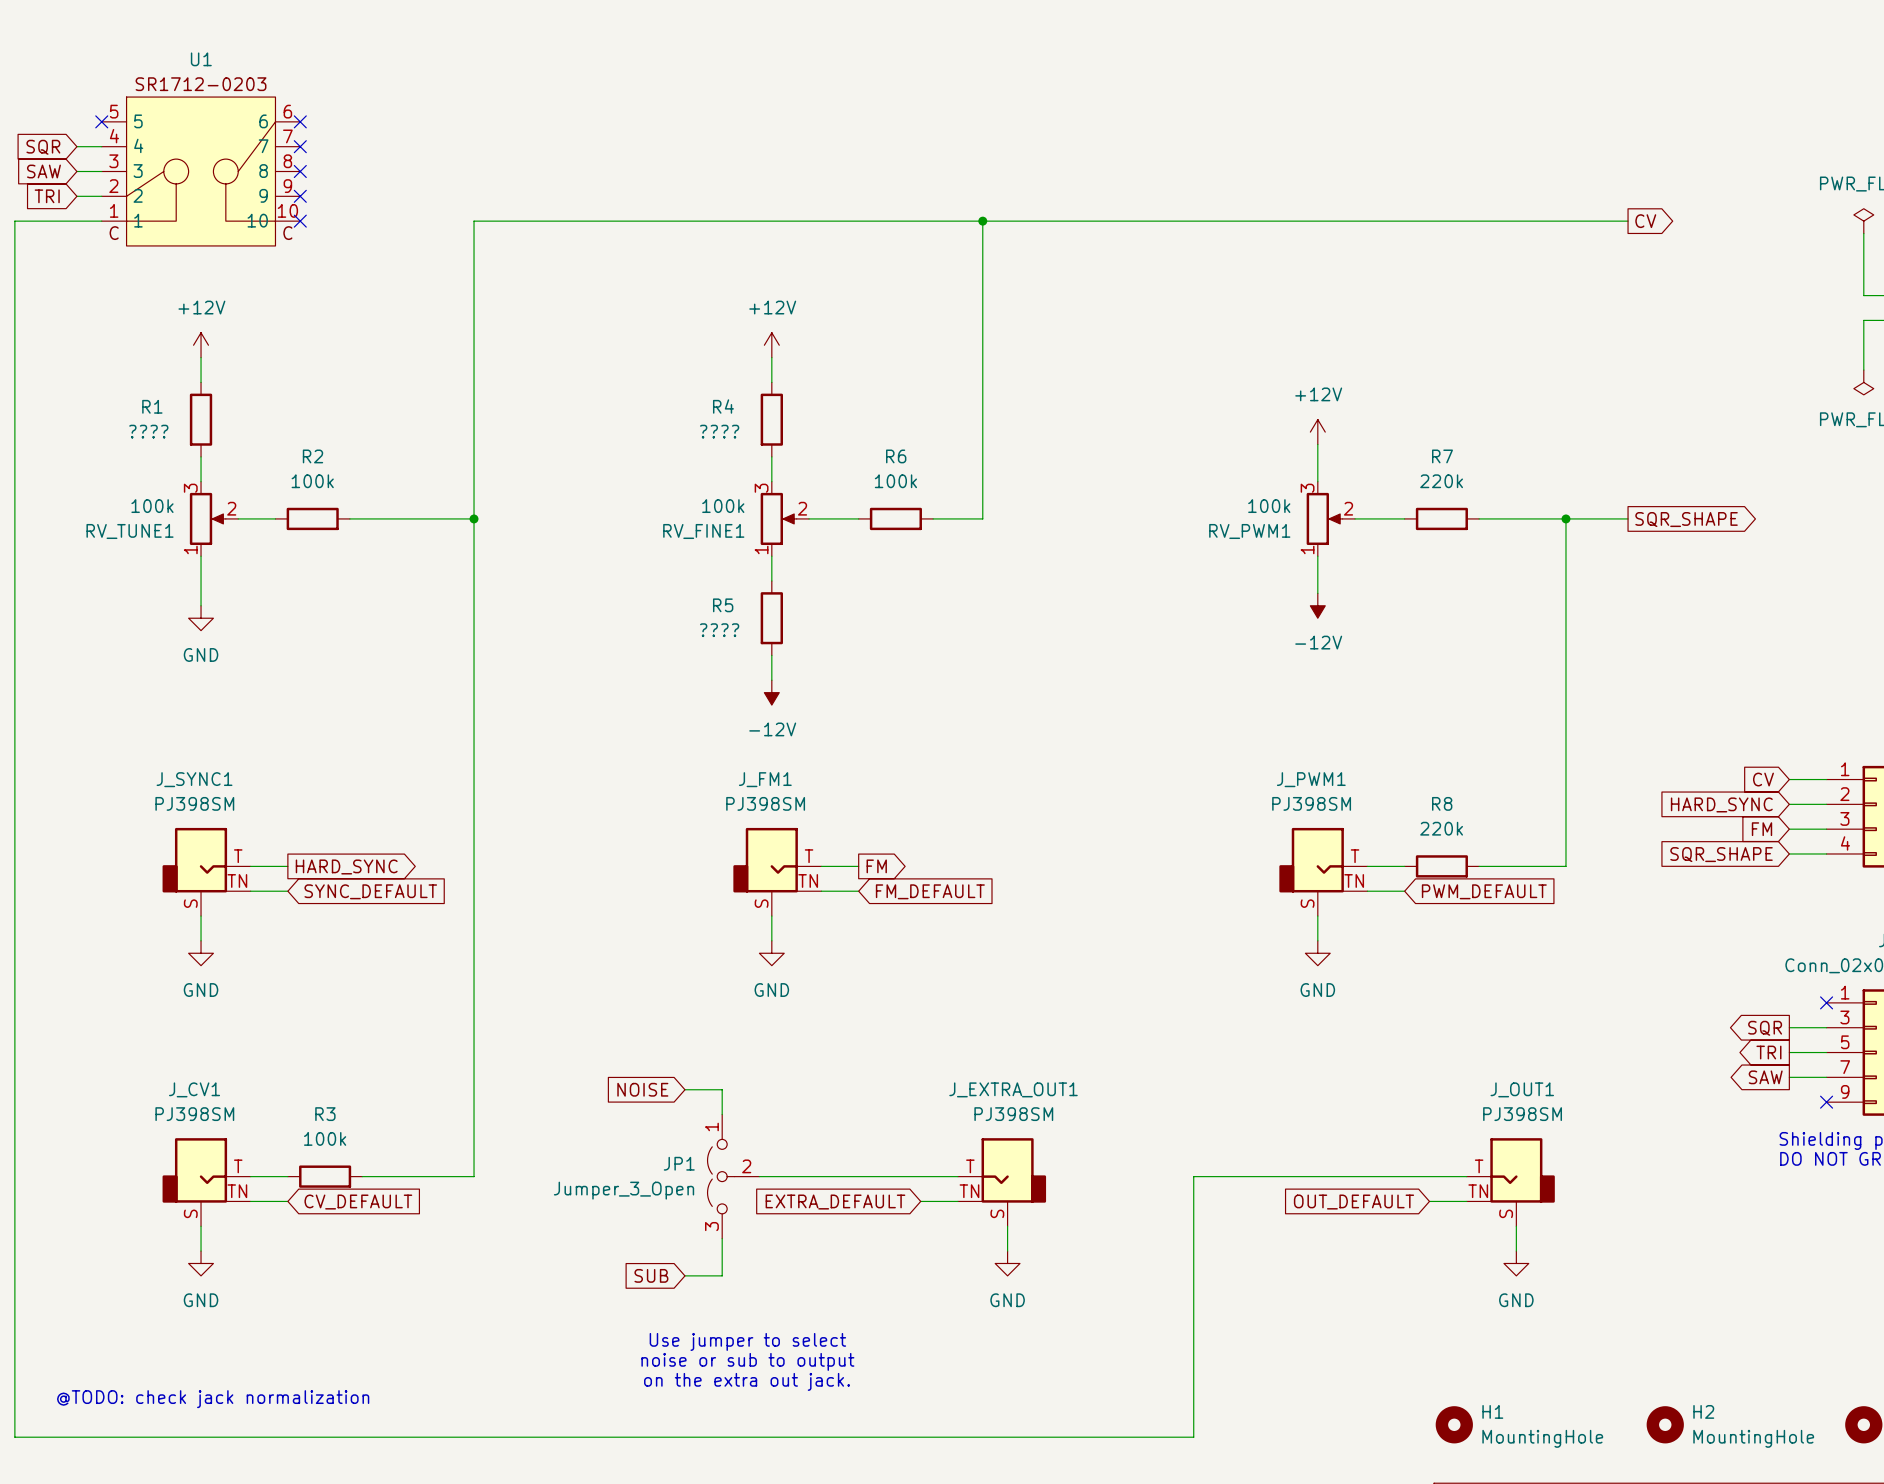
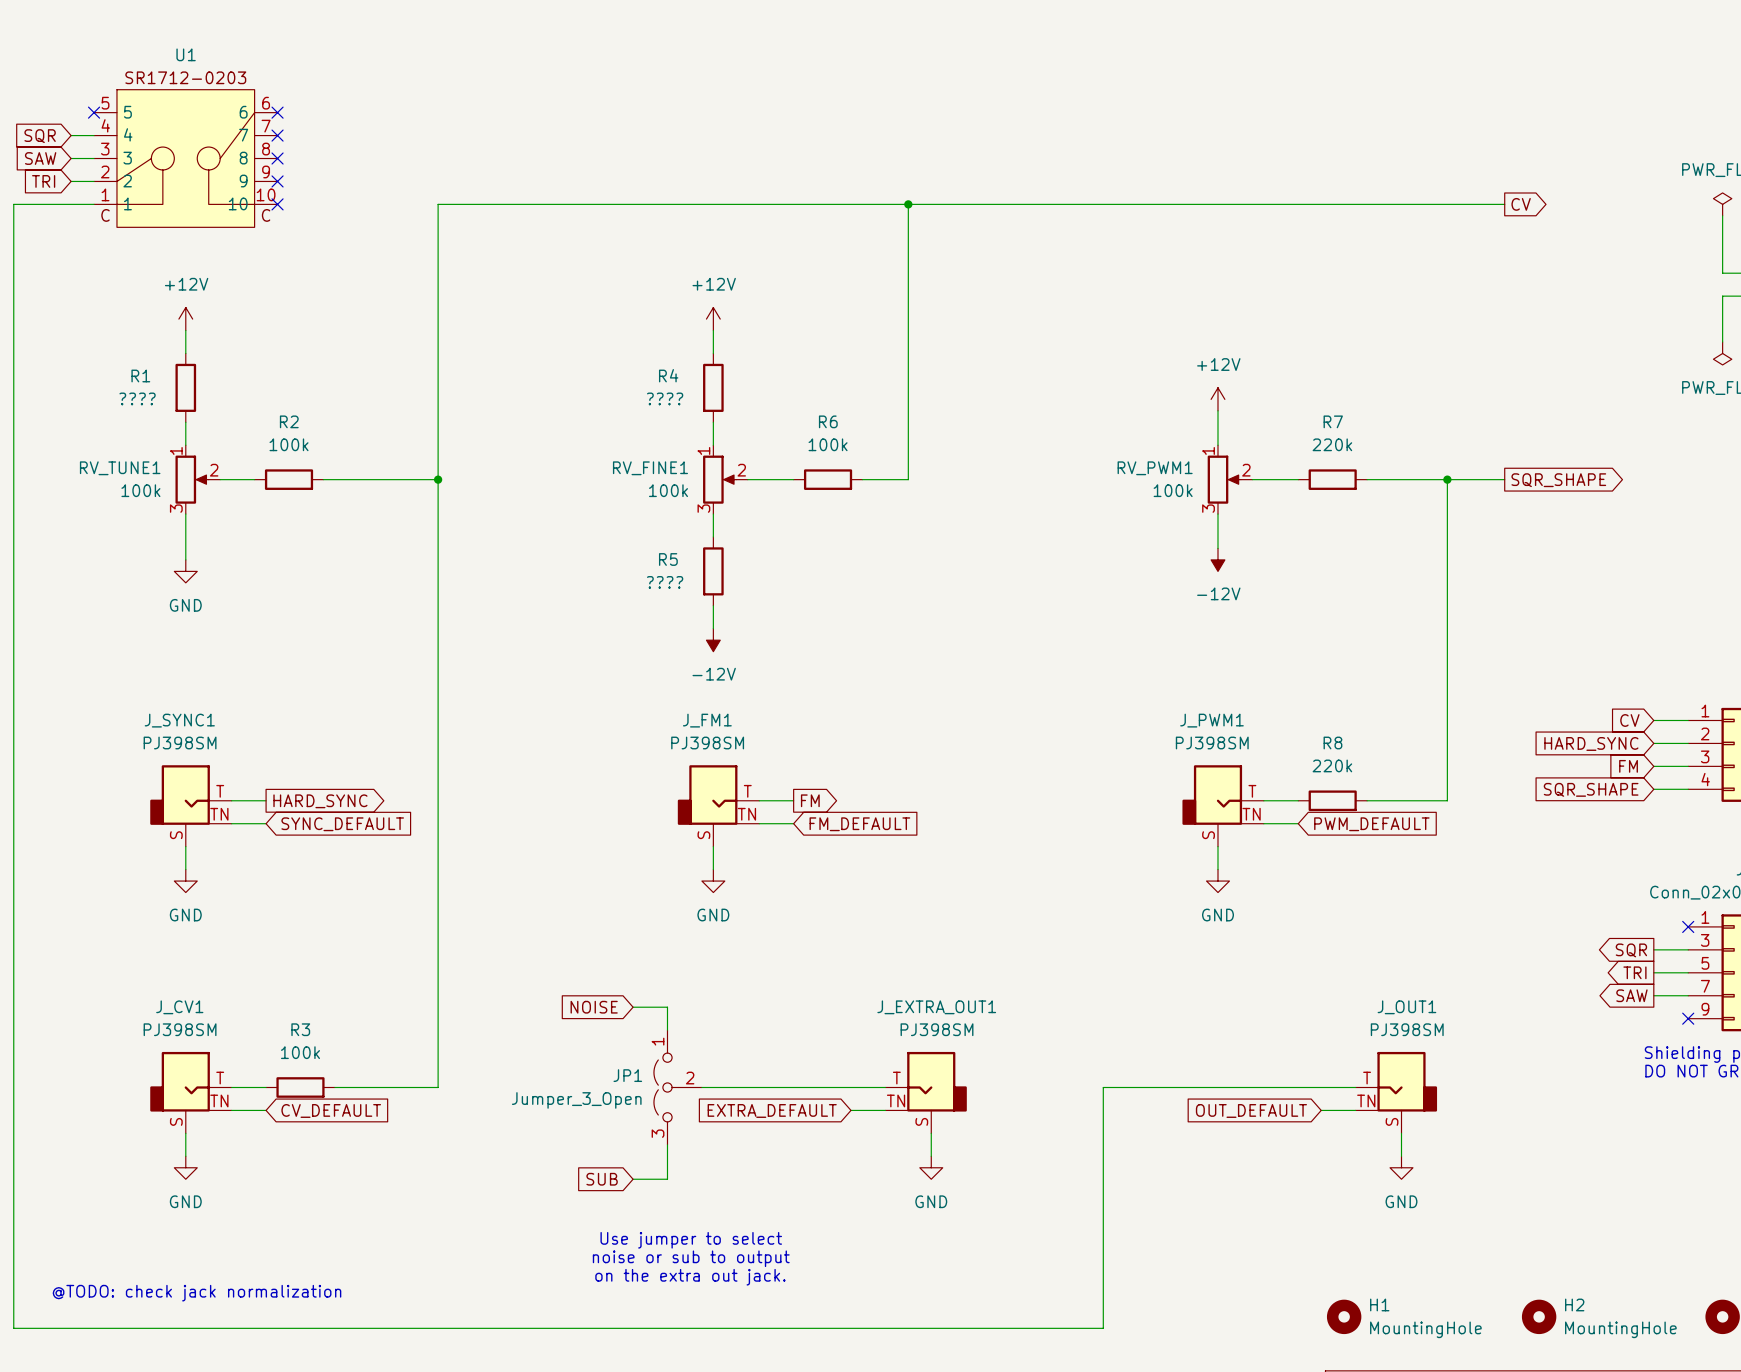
RV_TUNE1 flip: as is (207, 518) -> up-down (192, 479)
RV_FINE1 flip: as is (778, 518) -> up-down (719, 479)
RV_PWM1 flip: as is (1324, 518) -> up-down (1224, 479)

